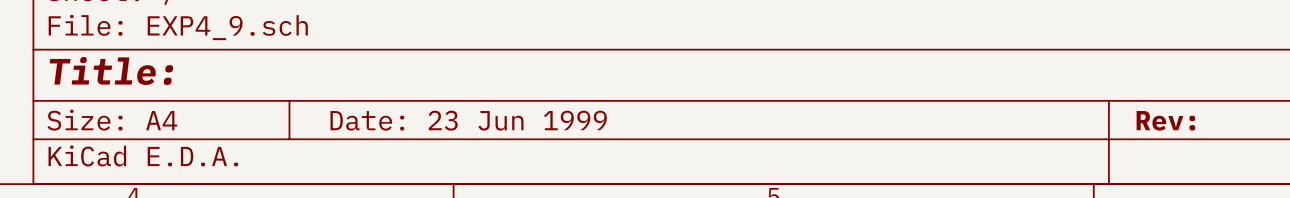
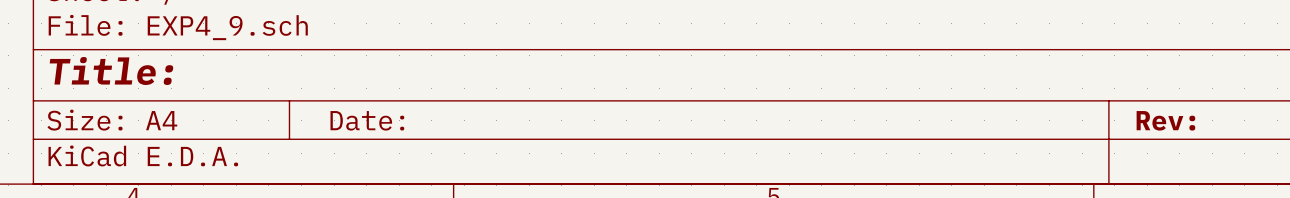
title block: Date: 23 Jun 1999 (468, 120) -> Date: (367, 120)

